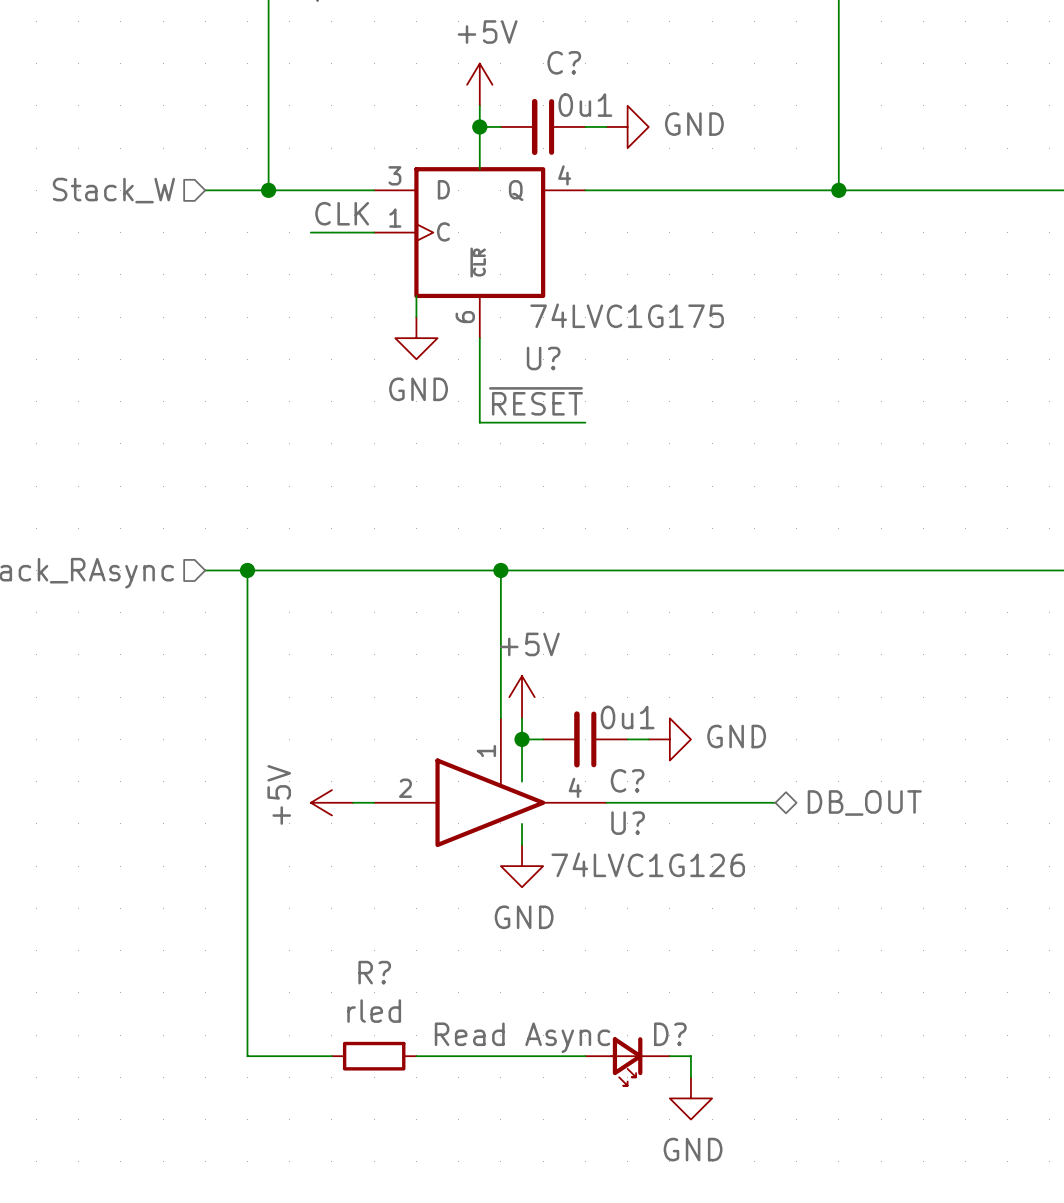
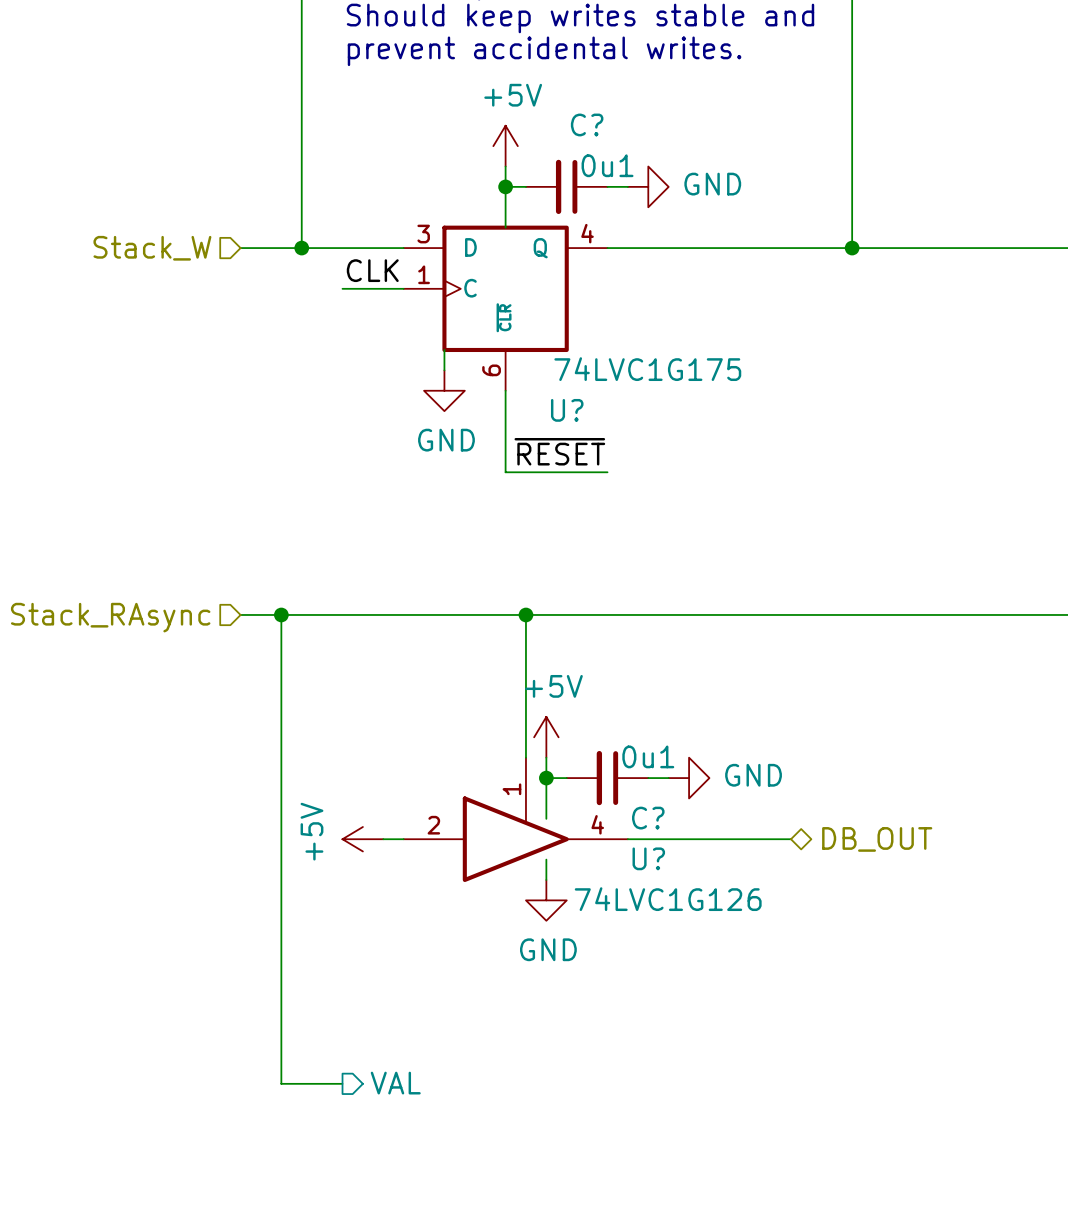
sheet pin: none -> VAL (395, 1083)
wire: (310, 1056) (331, 1056) -> none
R?: rled (374, 1056) -> none
wire: (416, 1056) (585, 1056) -> none
wire: (669, 1056) (690, 1056) (690, 1077) -> none
D?: Read Async (627, 1061) -> none
power symbol: GND (690, 1098) -> none

